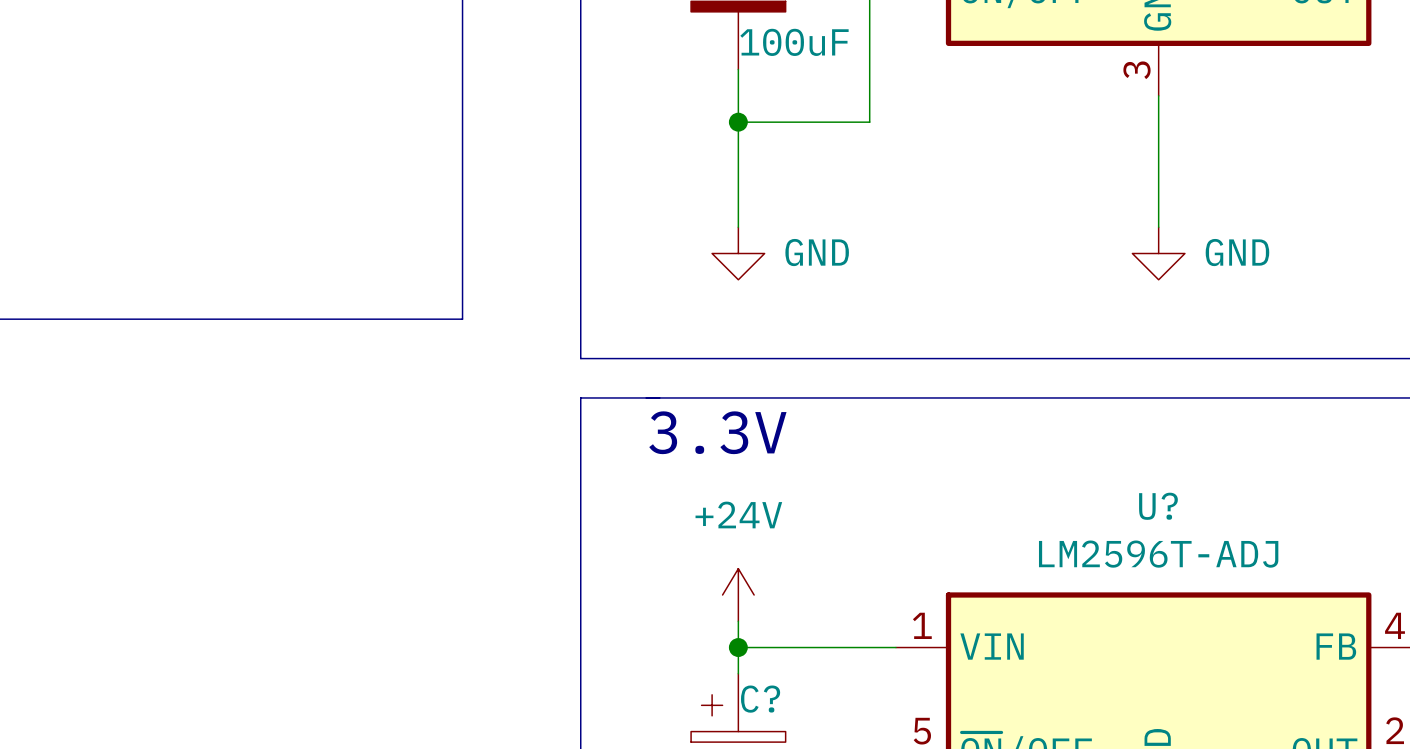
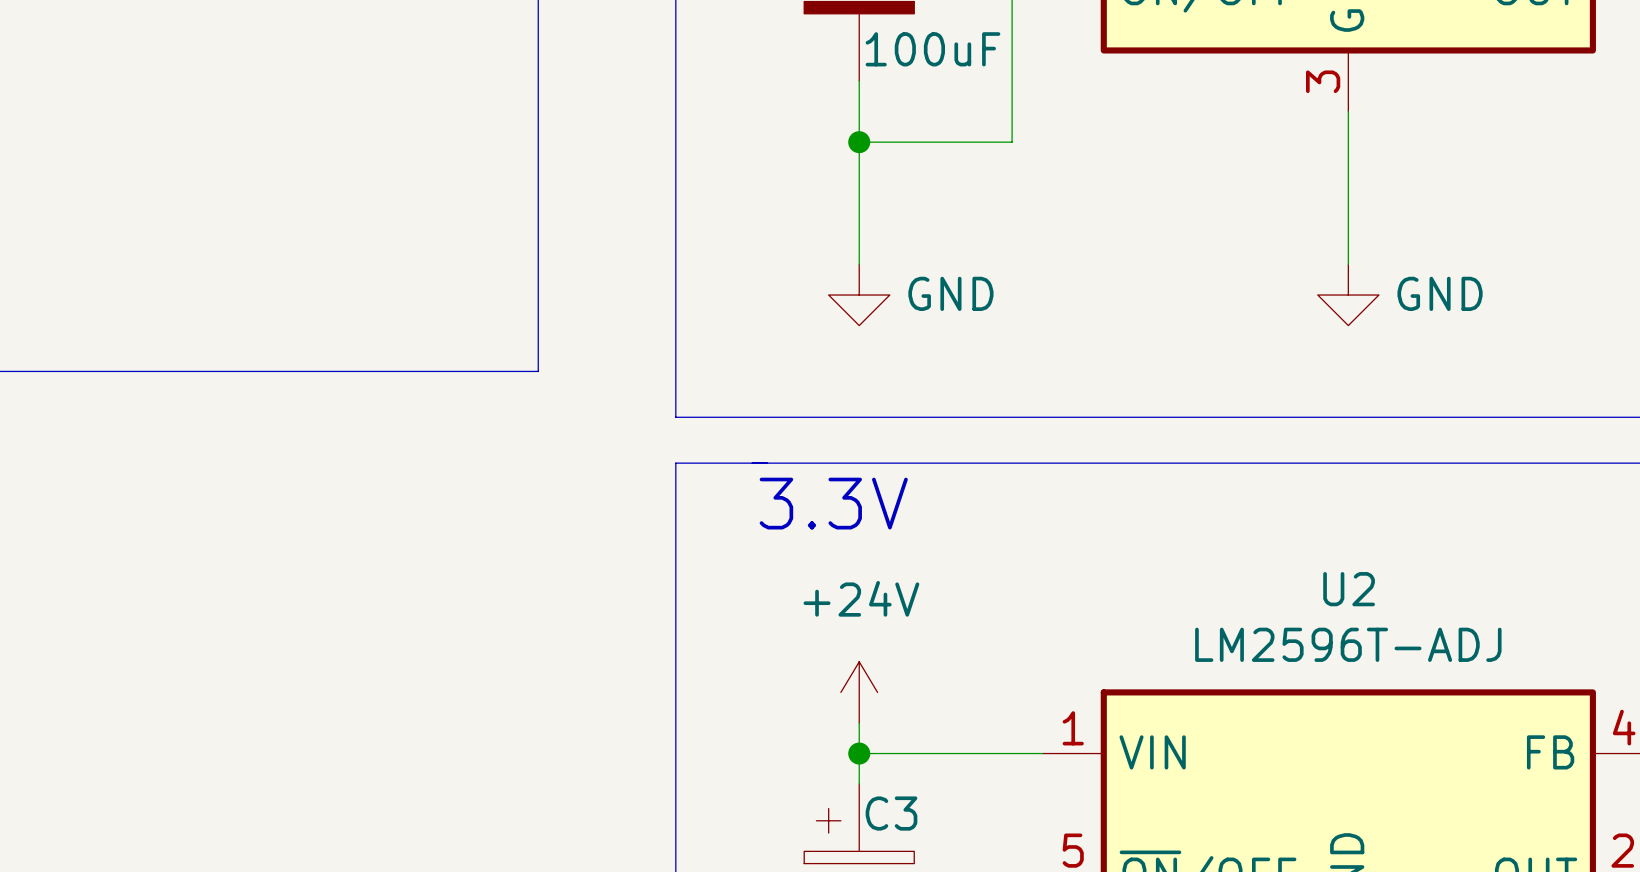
U? name: U? (1158, 506) -> U2 (1349, 589)
C? name: C? (760, 699) -> C3 (891, 813)

